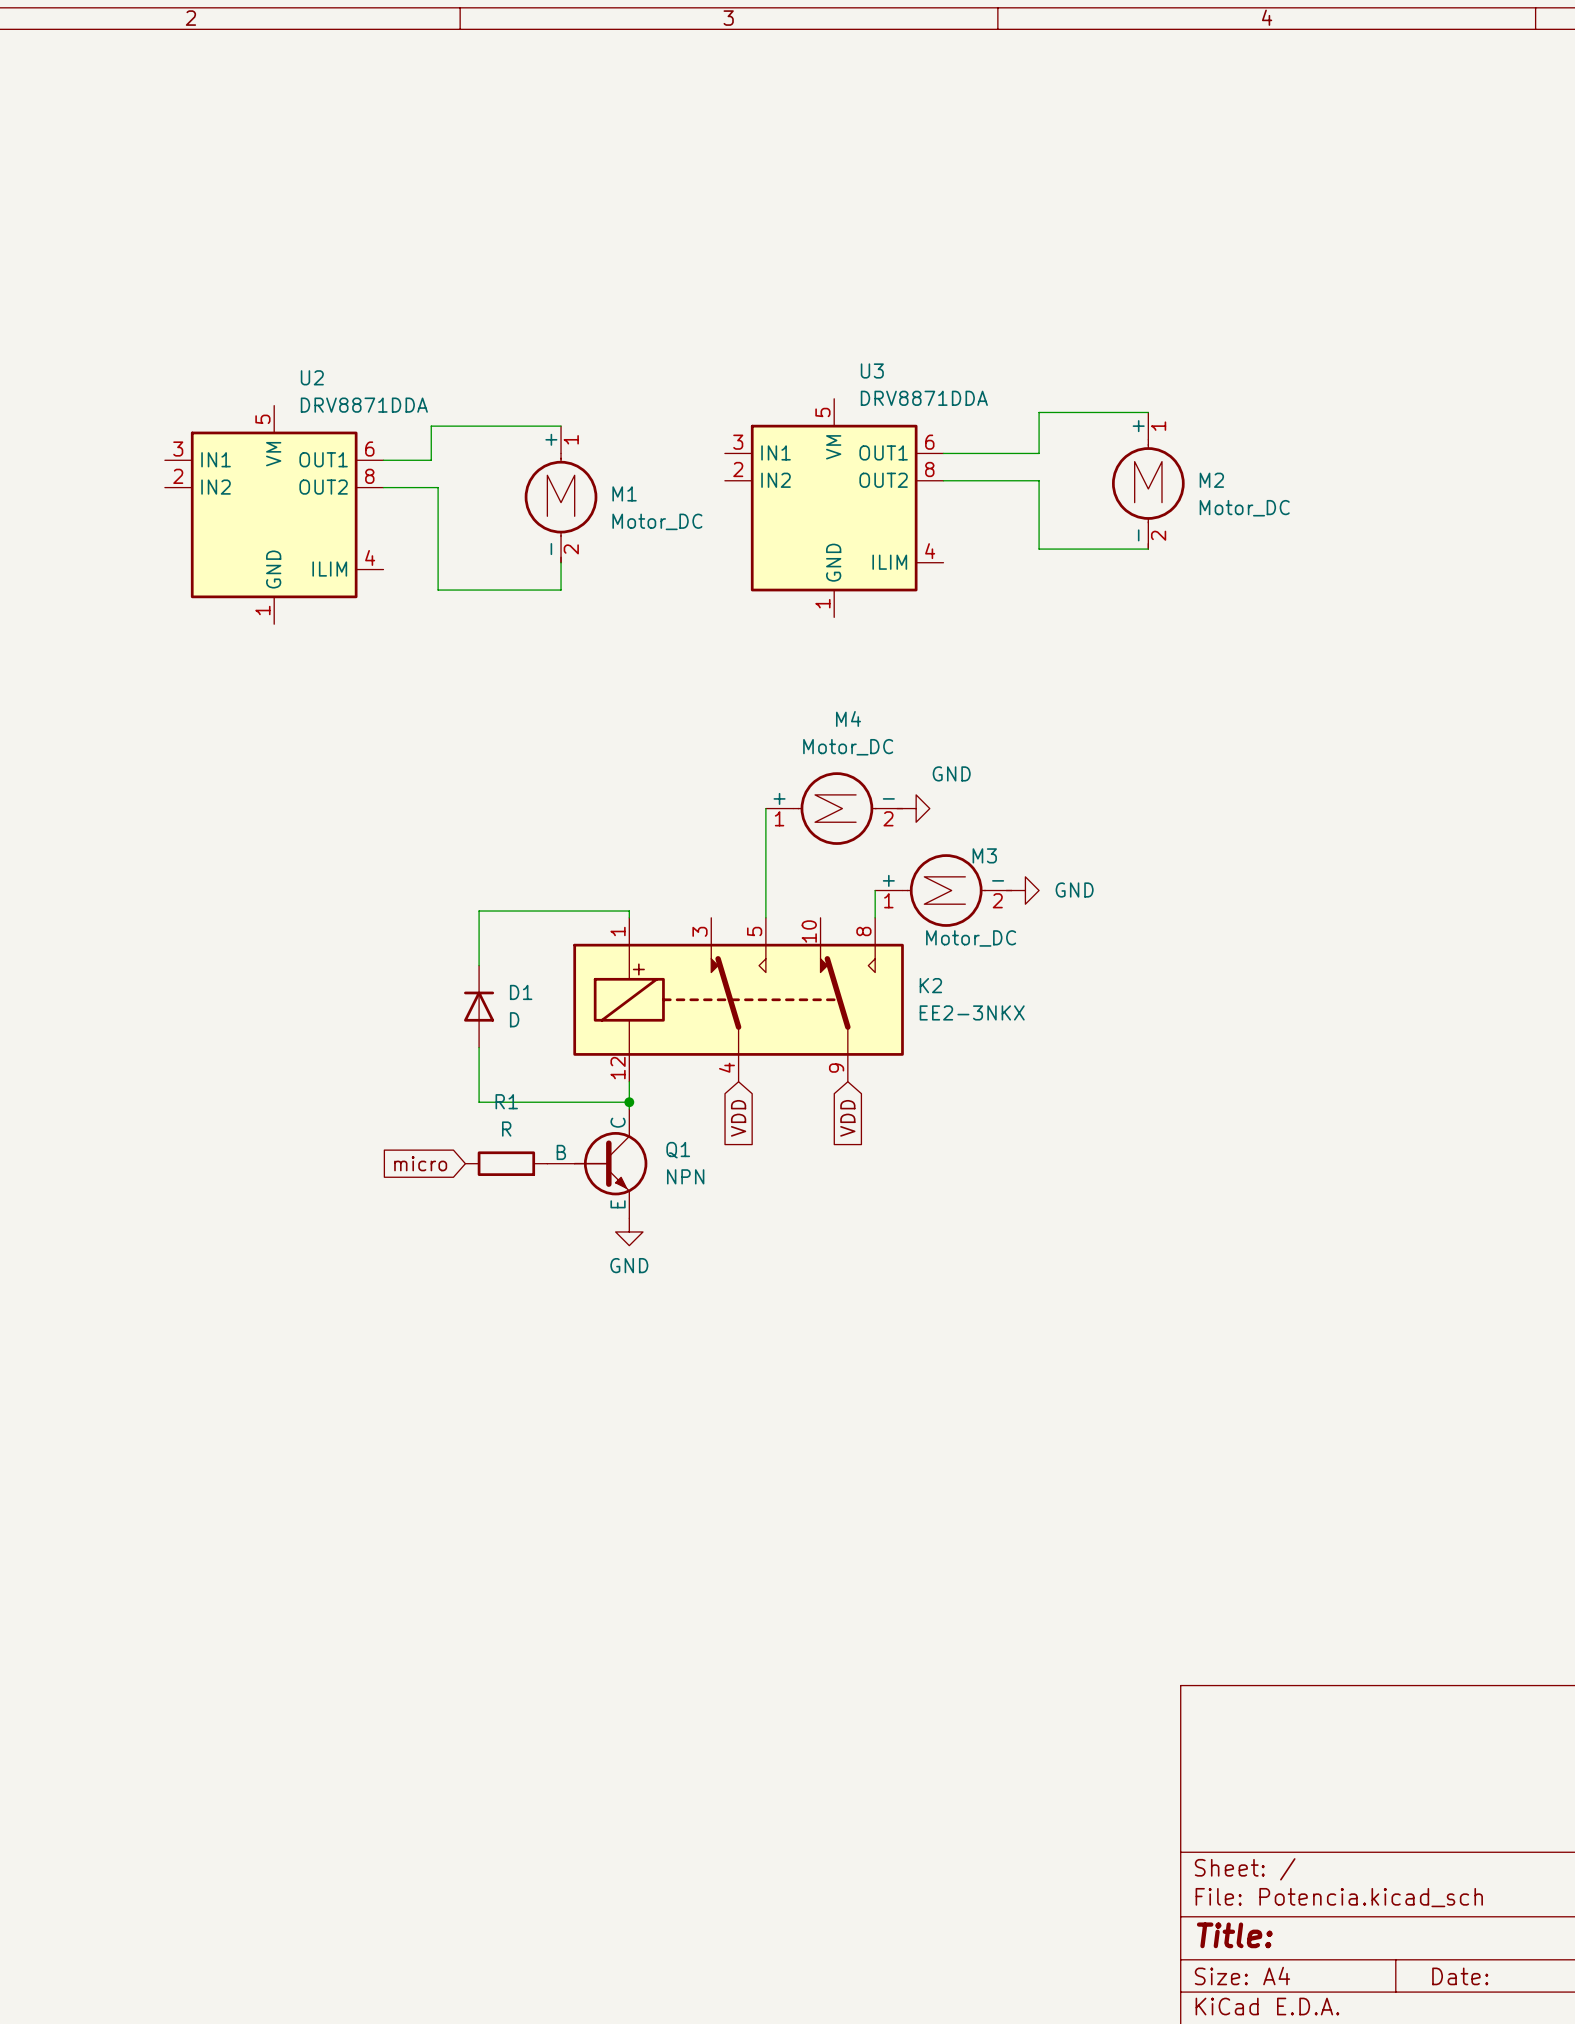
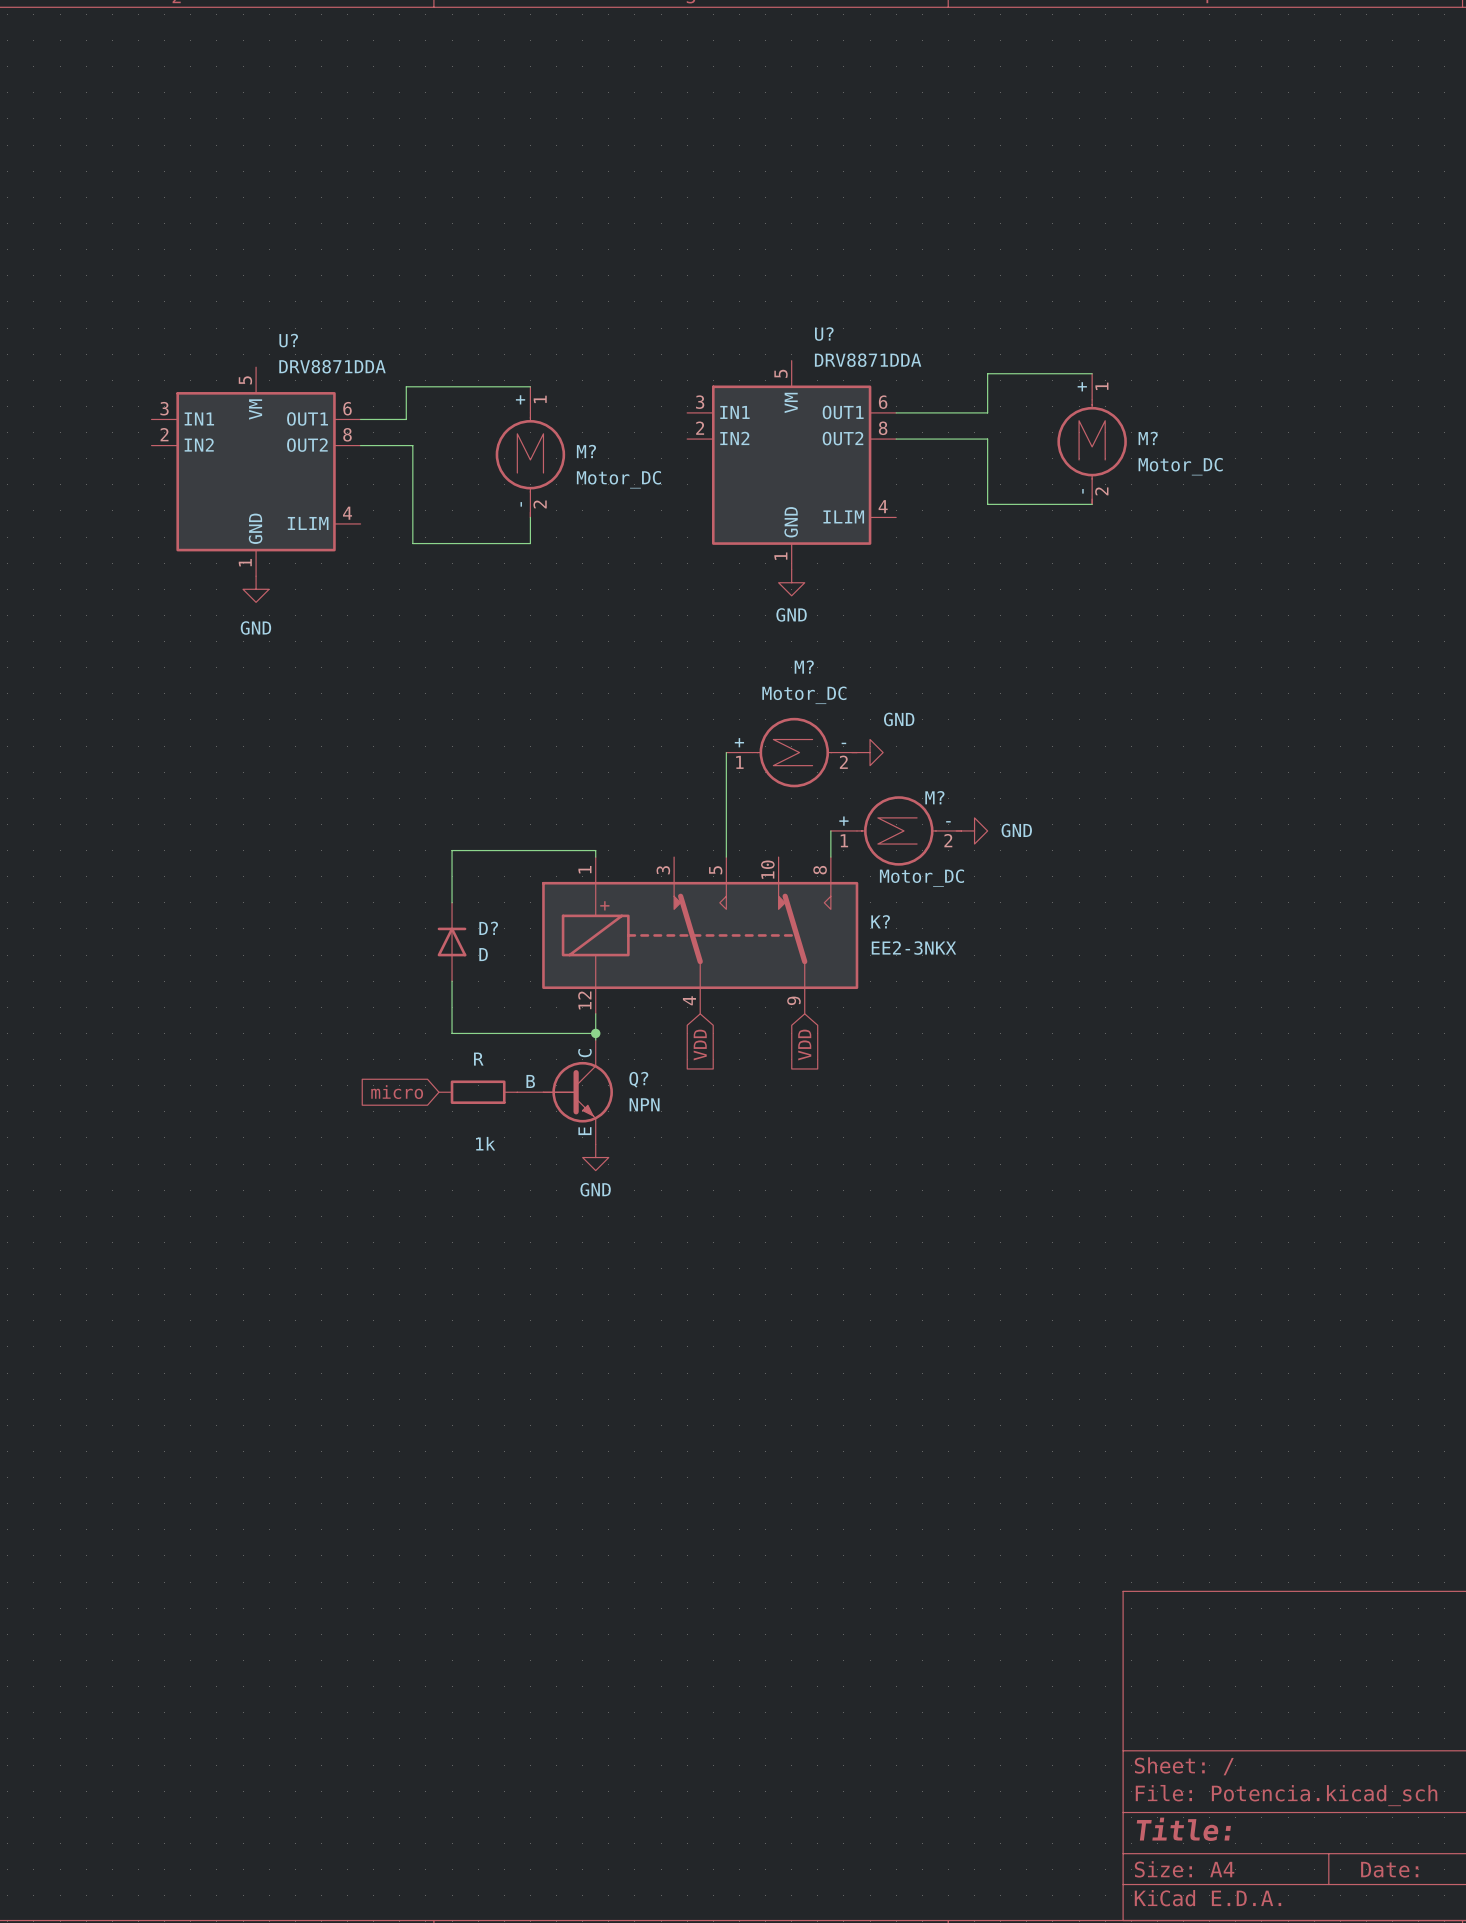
U3 name: U3 (872, 370) -> U? (824, 334)
U2 name: U2 (312, 377) -> U? (288, 340)
M2 name: M2 (1211, 480) -> M? (1148, 438)
M1 name: M1 (624, 493) -> M? (586, 451)
power symbol: none -> GND (791, 582)
power symbol: none -> GND (256, 589)
M4 name: M4 (848, 718) -> M? (804, 667)
M3 name: M3 (984, 855) -> M? (934, 797)
K2 name: K2 (930, 985) -> K? (880, 921)
D1 name: D1 (521, 992) -> D? (488, 928)
R1 name: R1 (506, 1101) -> 1k (485, 1143)
Q1 name: Q1 (678, 1150) -> Q? (638, 1079)

